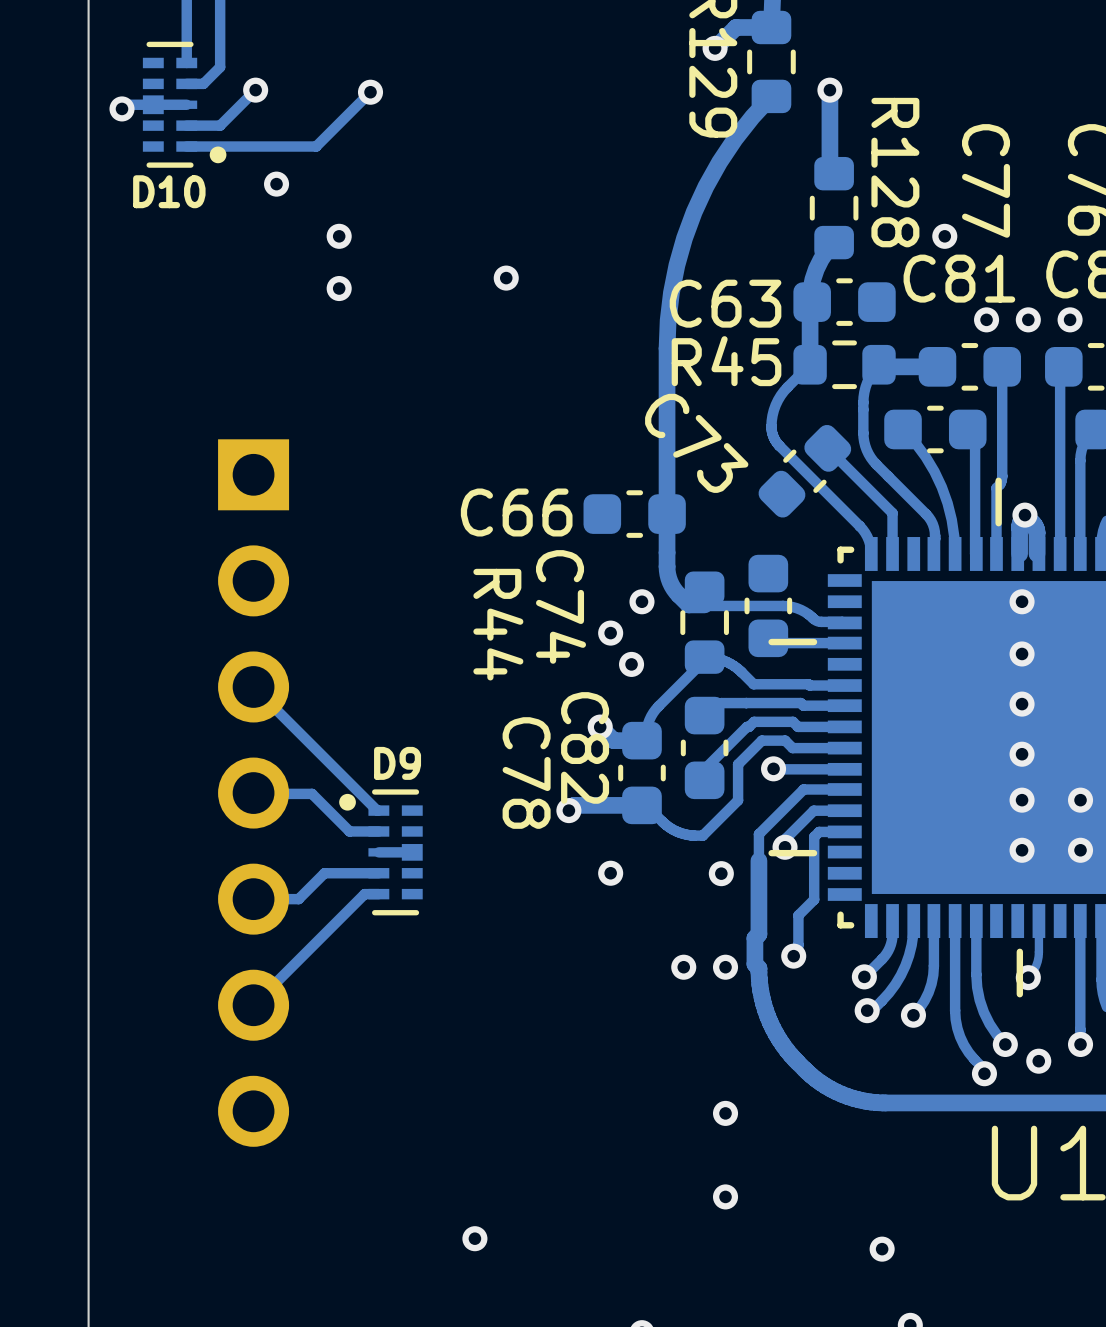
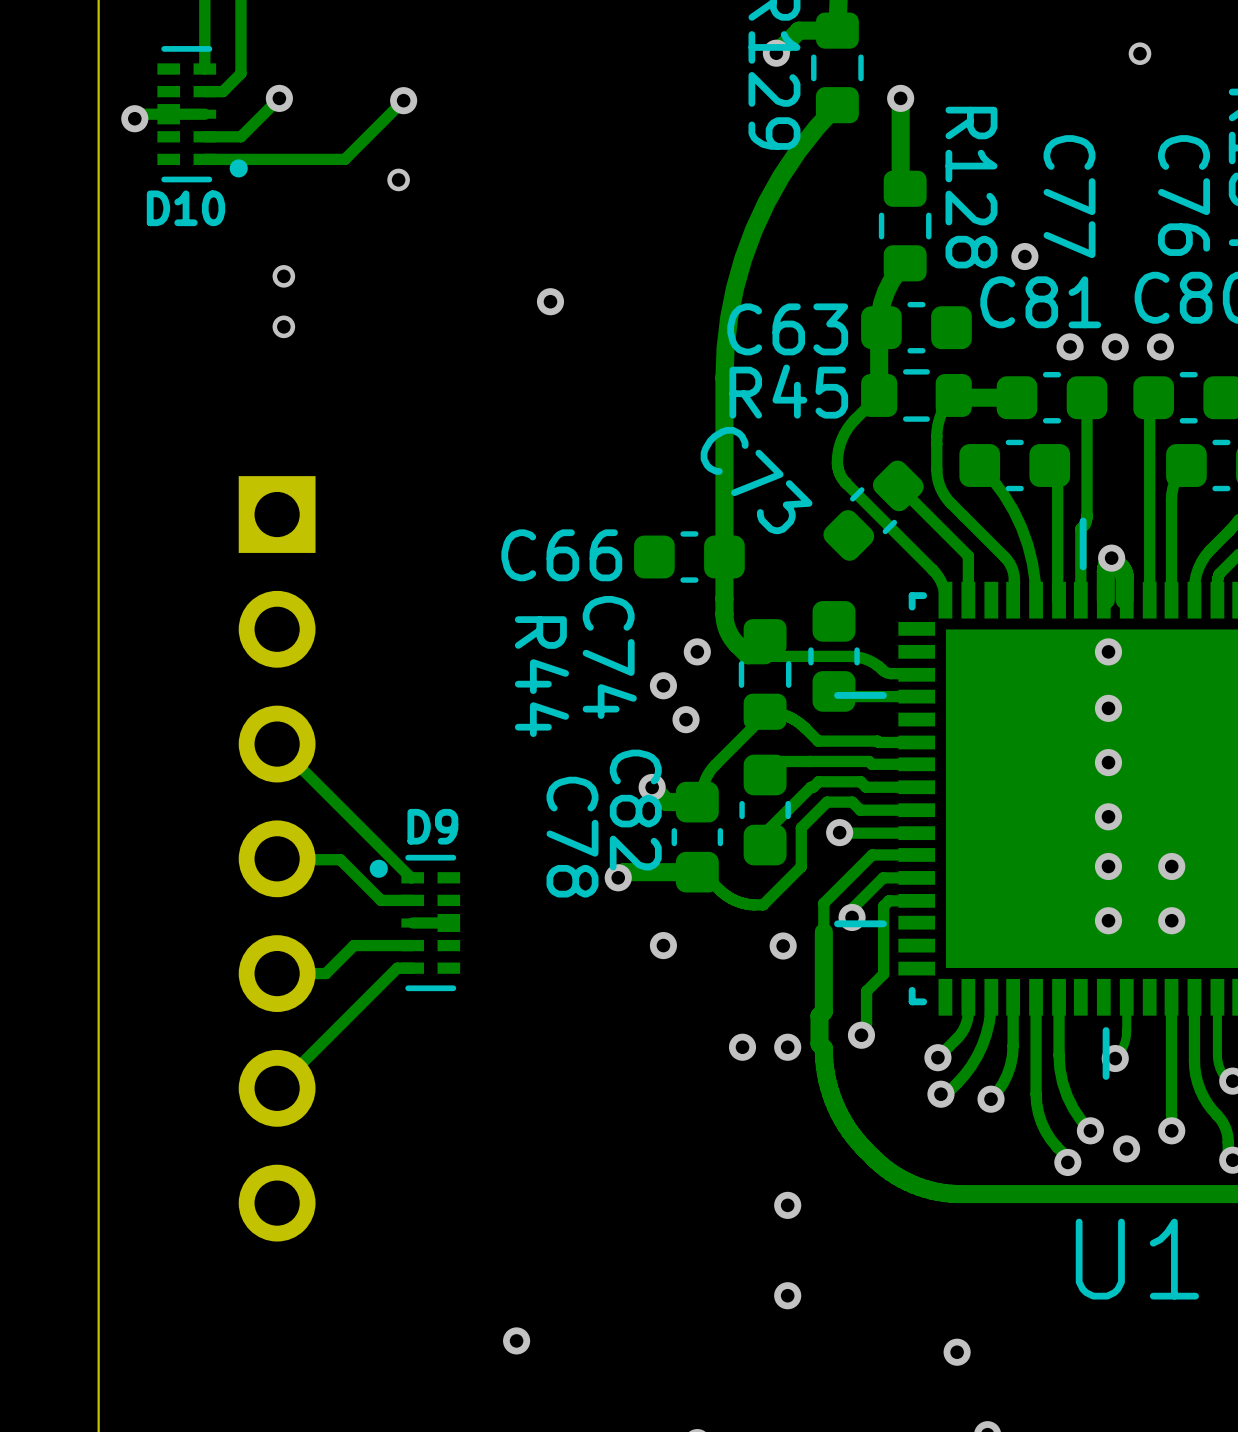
via: none -> (1139, 53)
via: none -> (398, 179)
via: (276, 184) -> none
via: (339, 236) -> none
via: none -> (283, 276)
via: (339, 288) -> none
via: none -> (283, 326)

